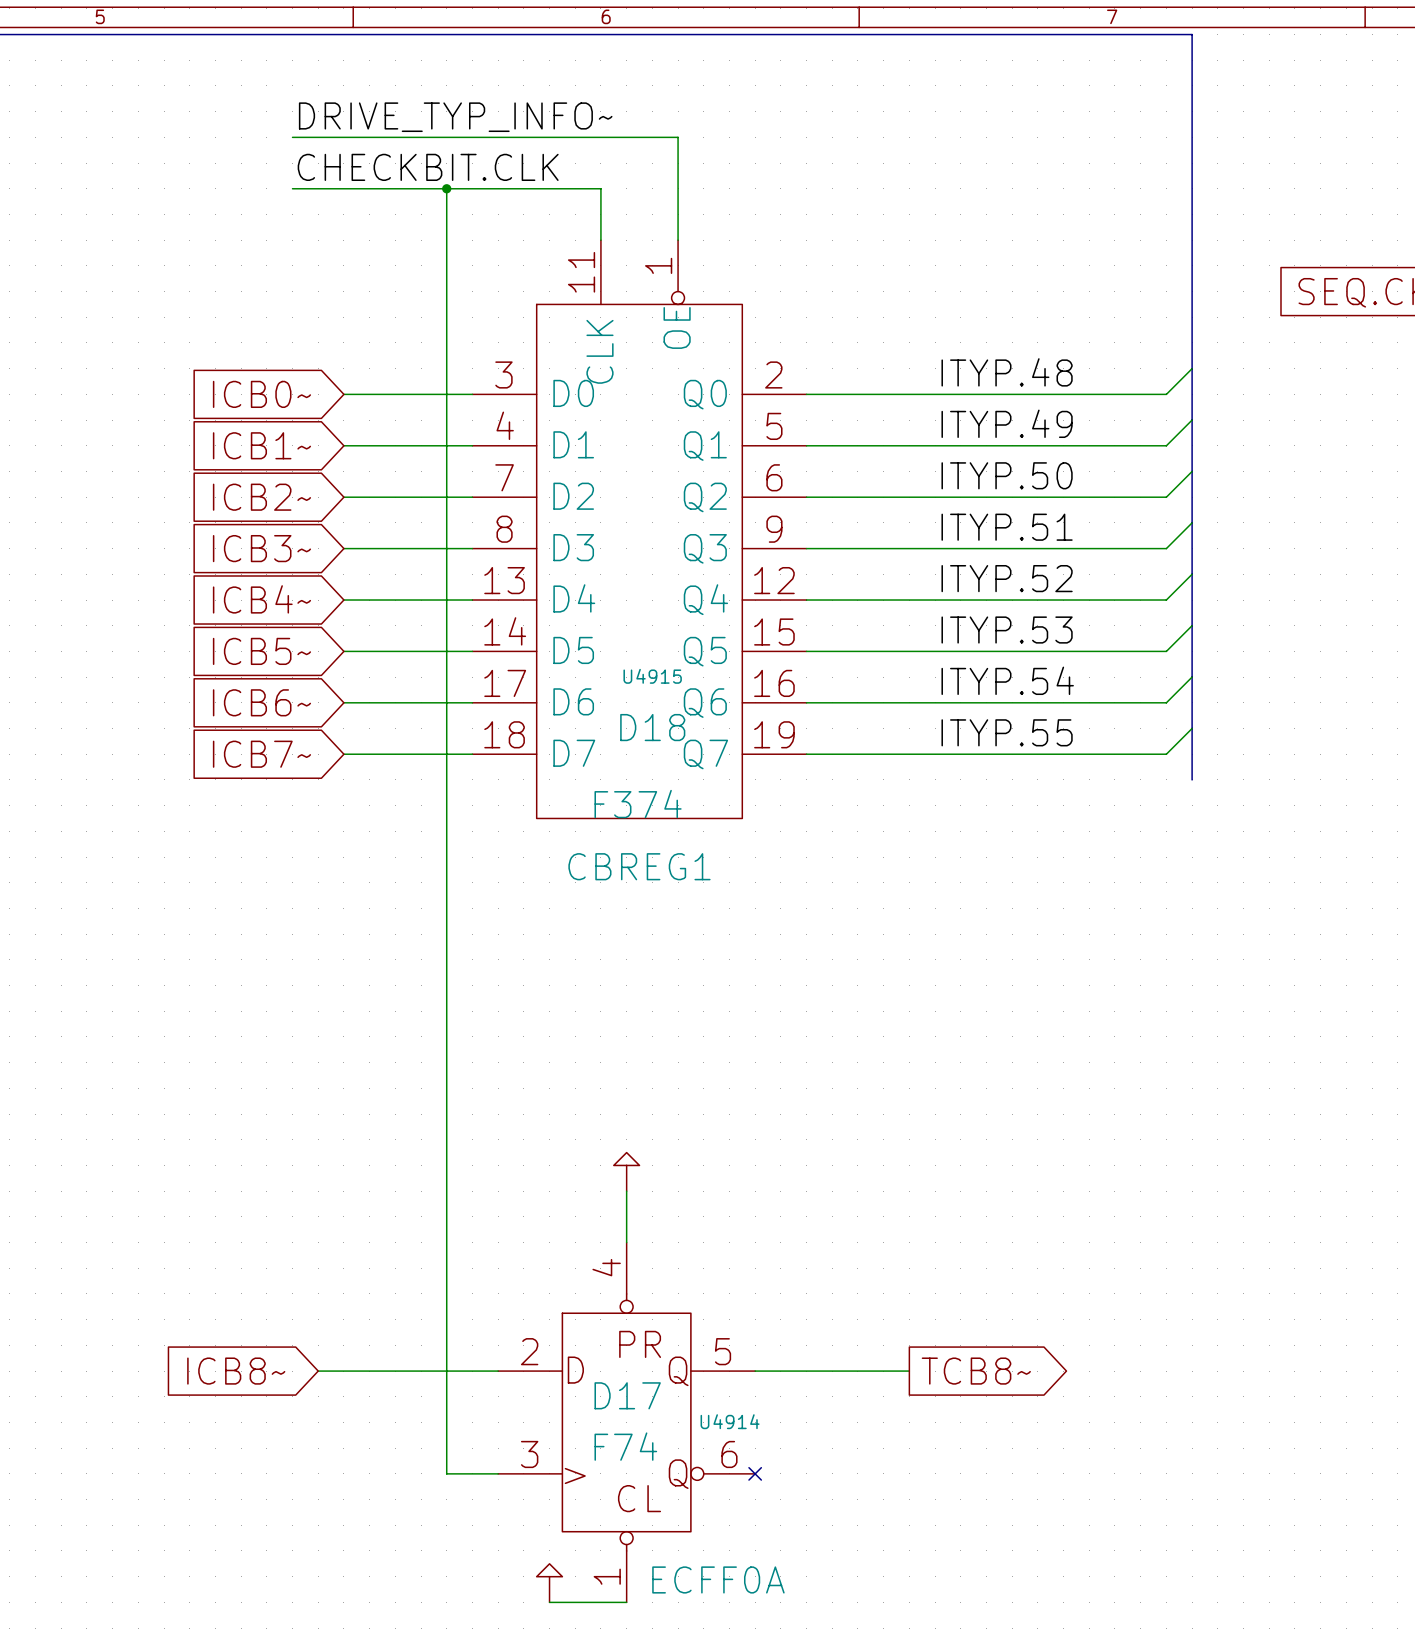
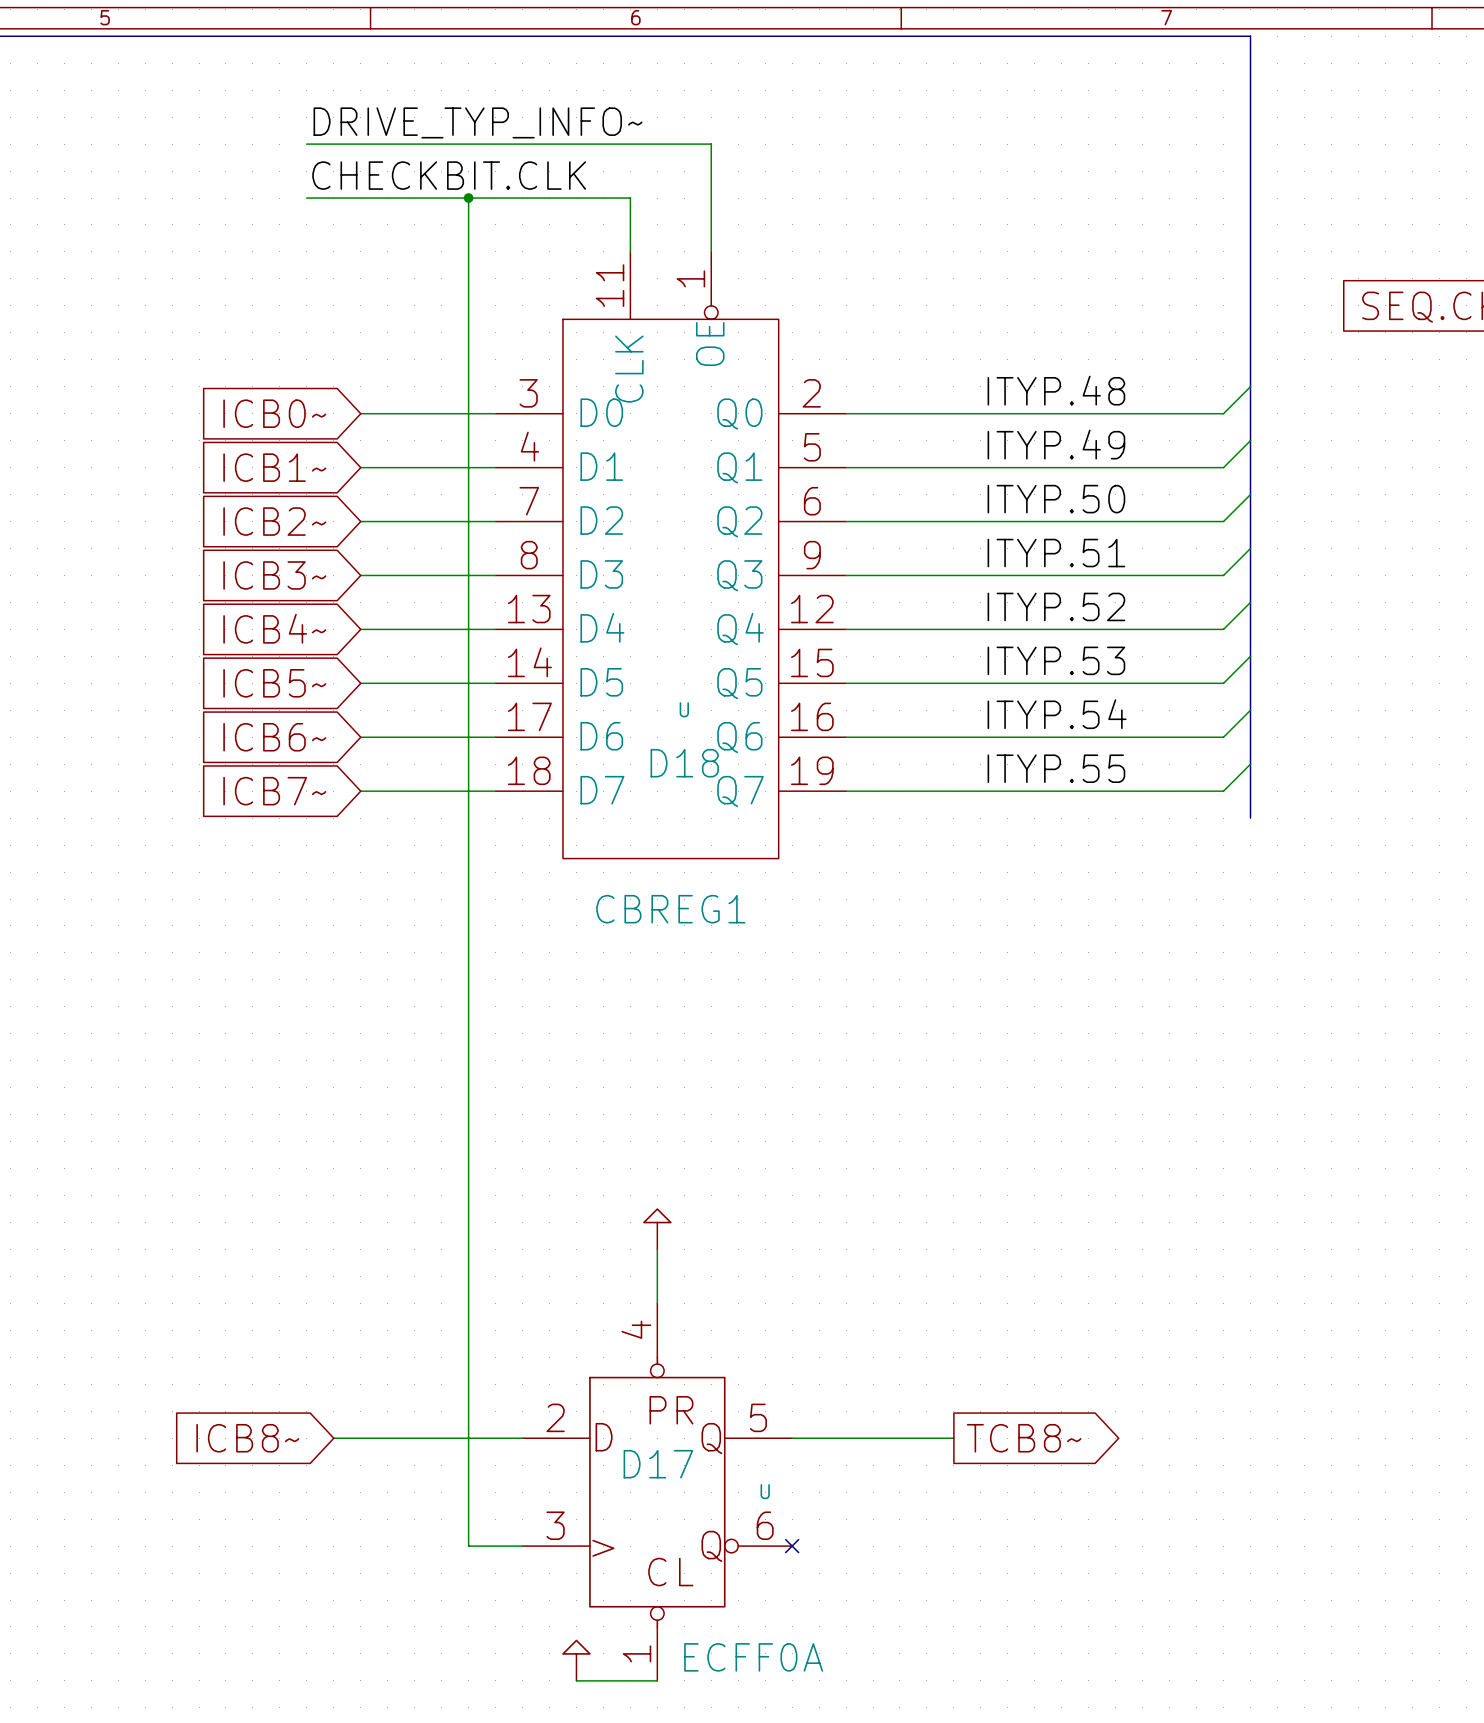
U4915 name: U4915 (652, 676) -> U (684, 709)
U4915 value: F374 (638, 804) -> none
U4914 name: U4914 (730, 1421) -> U (765, 1491)
U4914 value: F74 (625, 1446) -> none

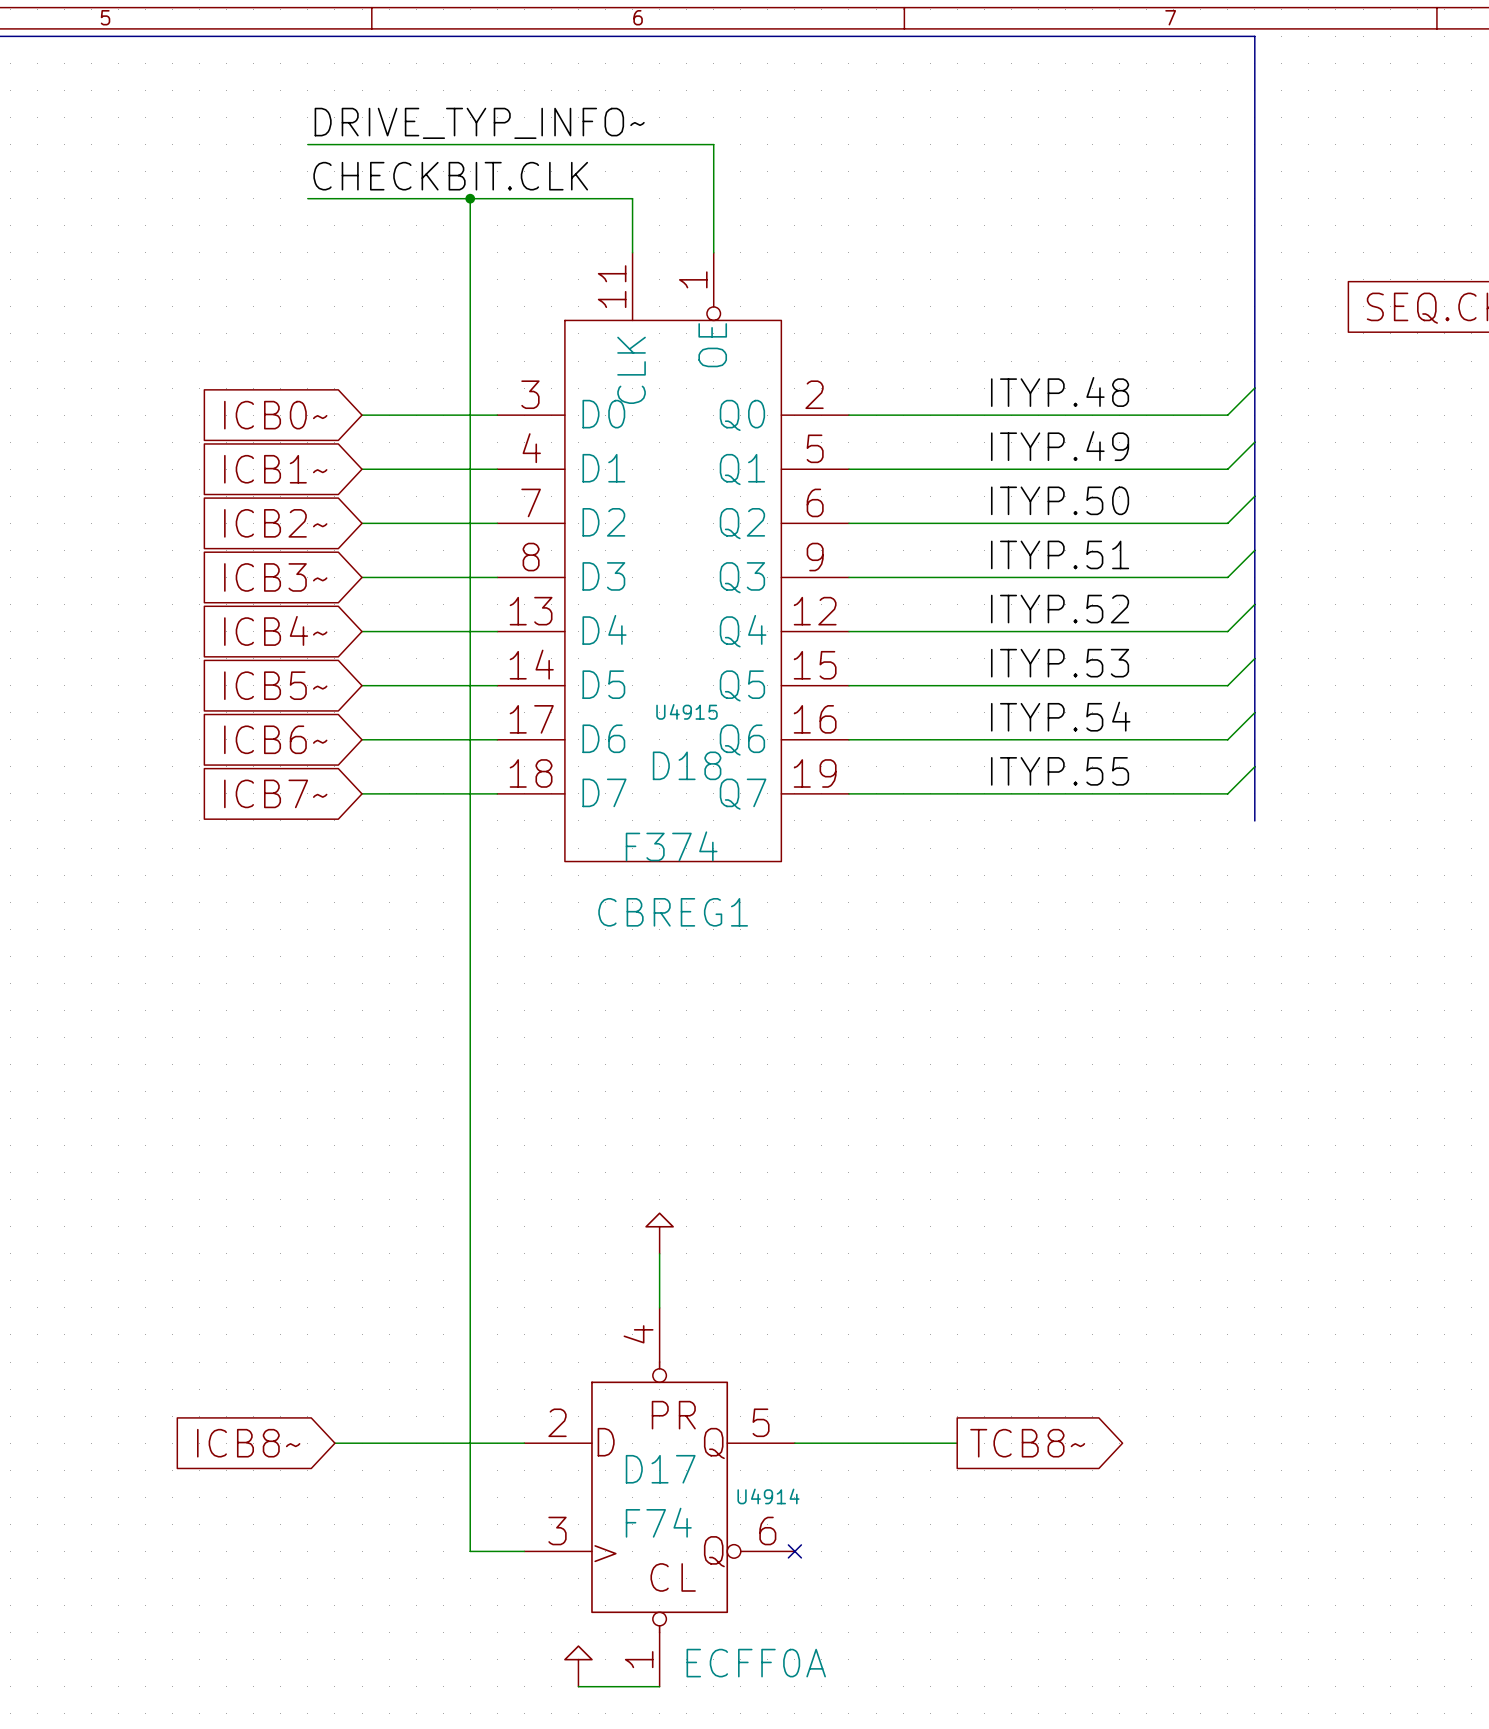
U name: U (684, 709) -> U4915 (686, 711)
U value: none -> F374 (671, 846)
U name: U (765, 1491) -> U4914 (768, 1496)
U value: none -> F74 (658, 1522)

